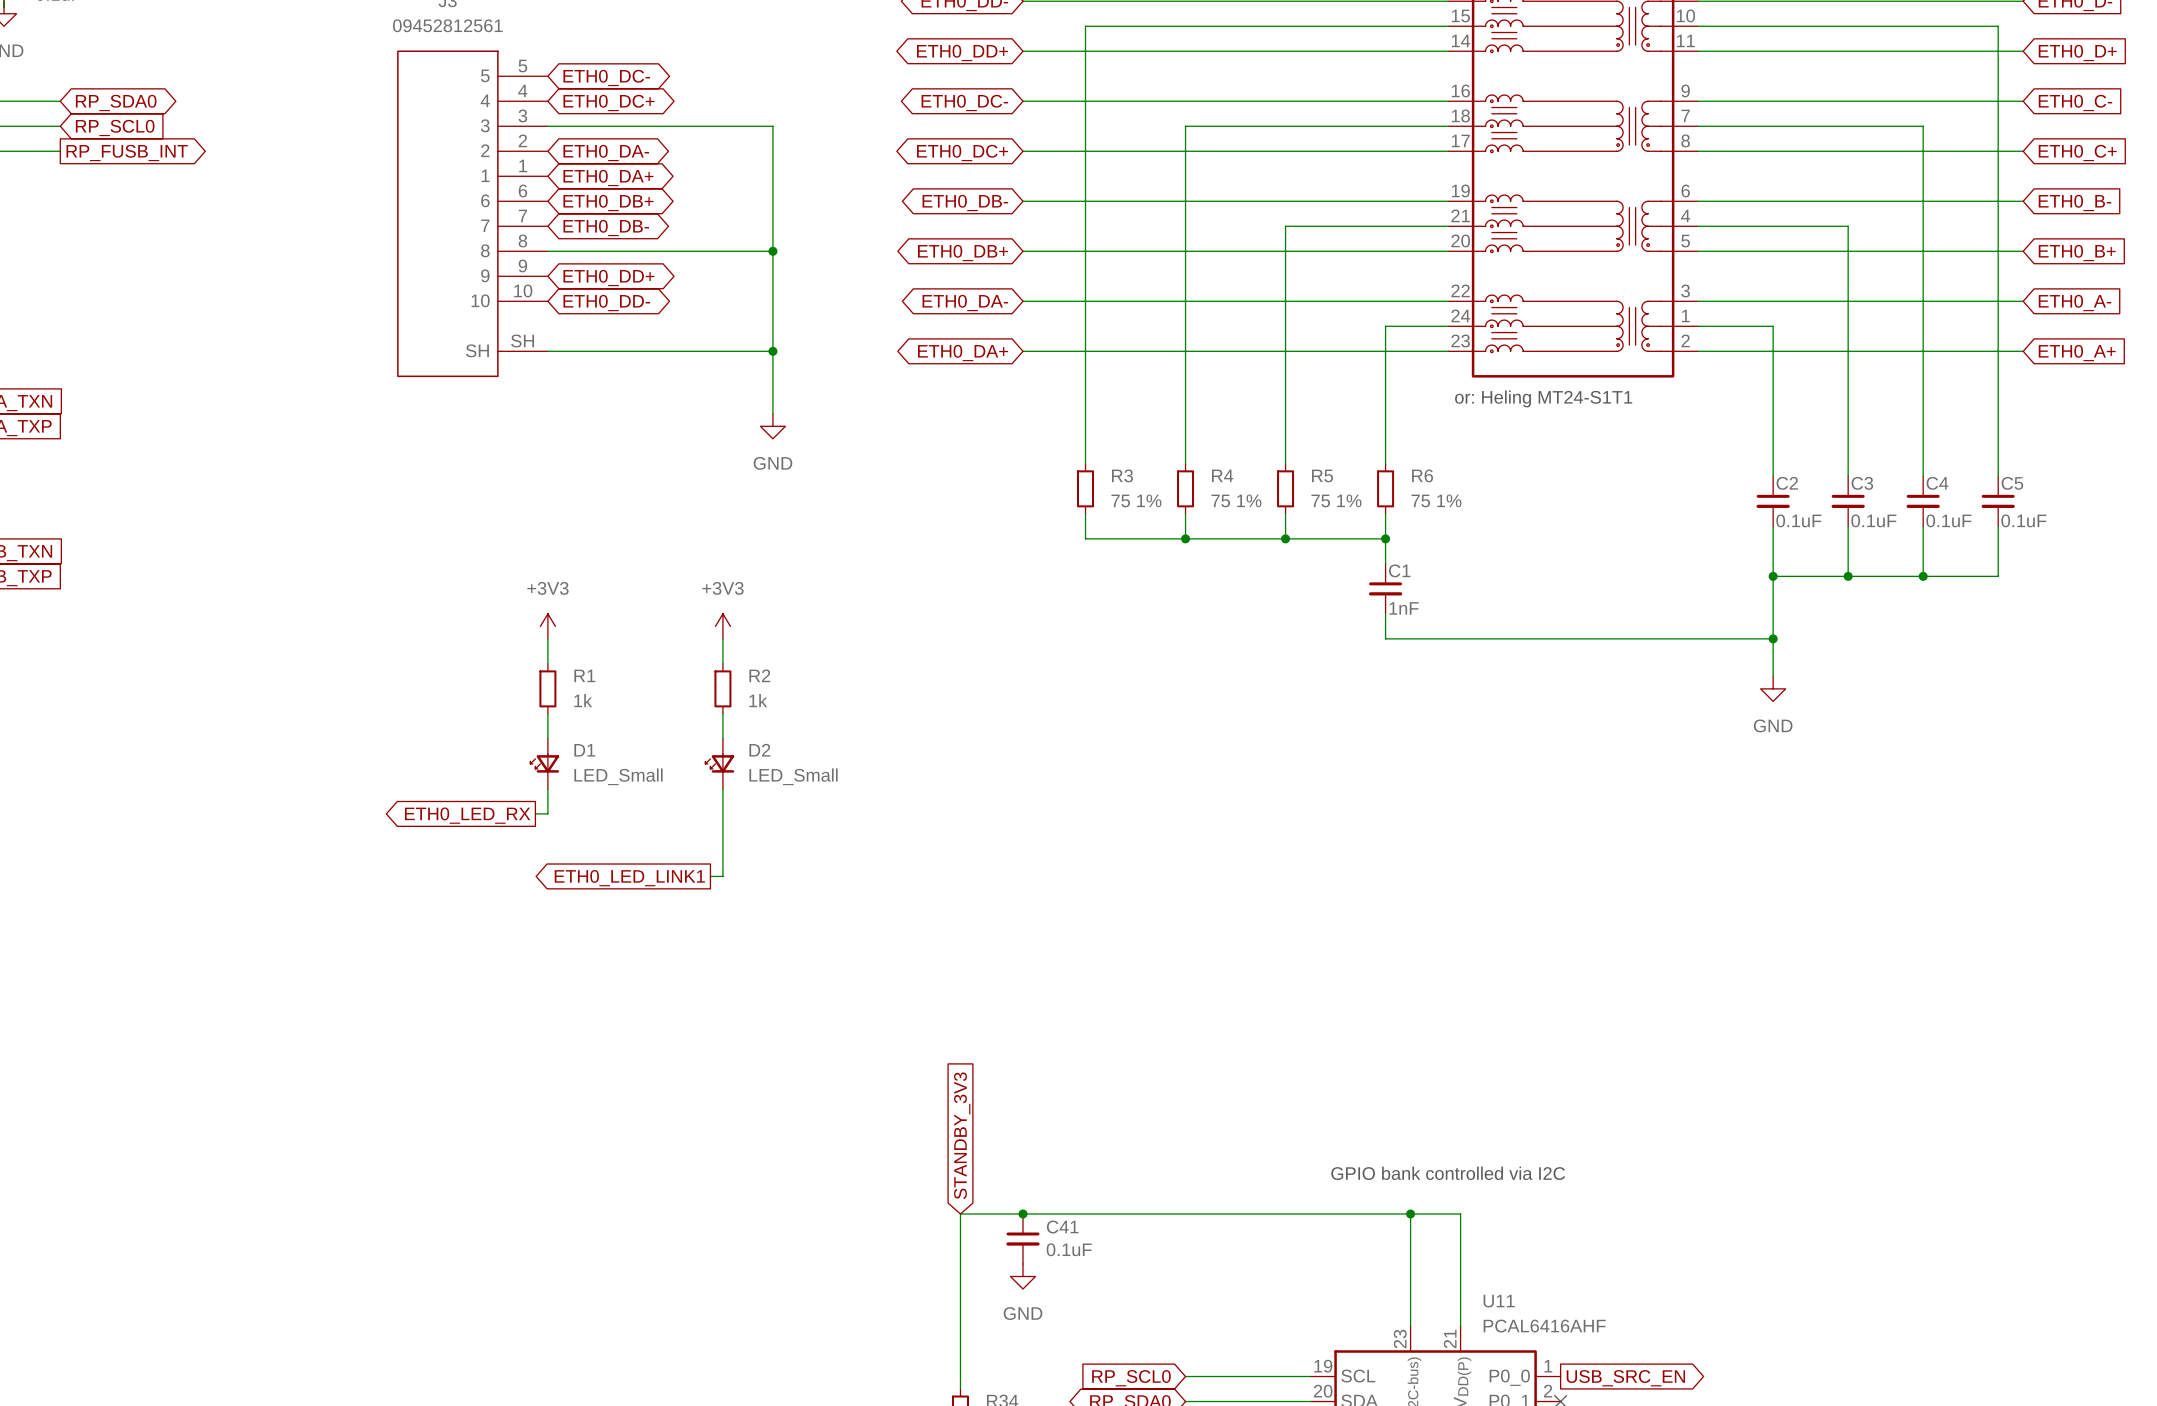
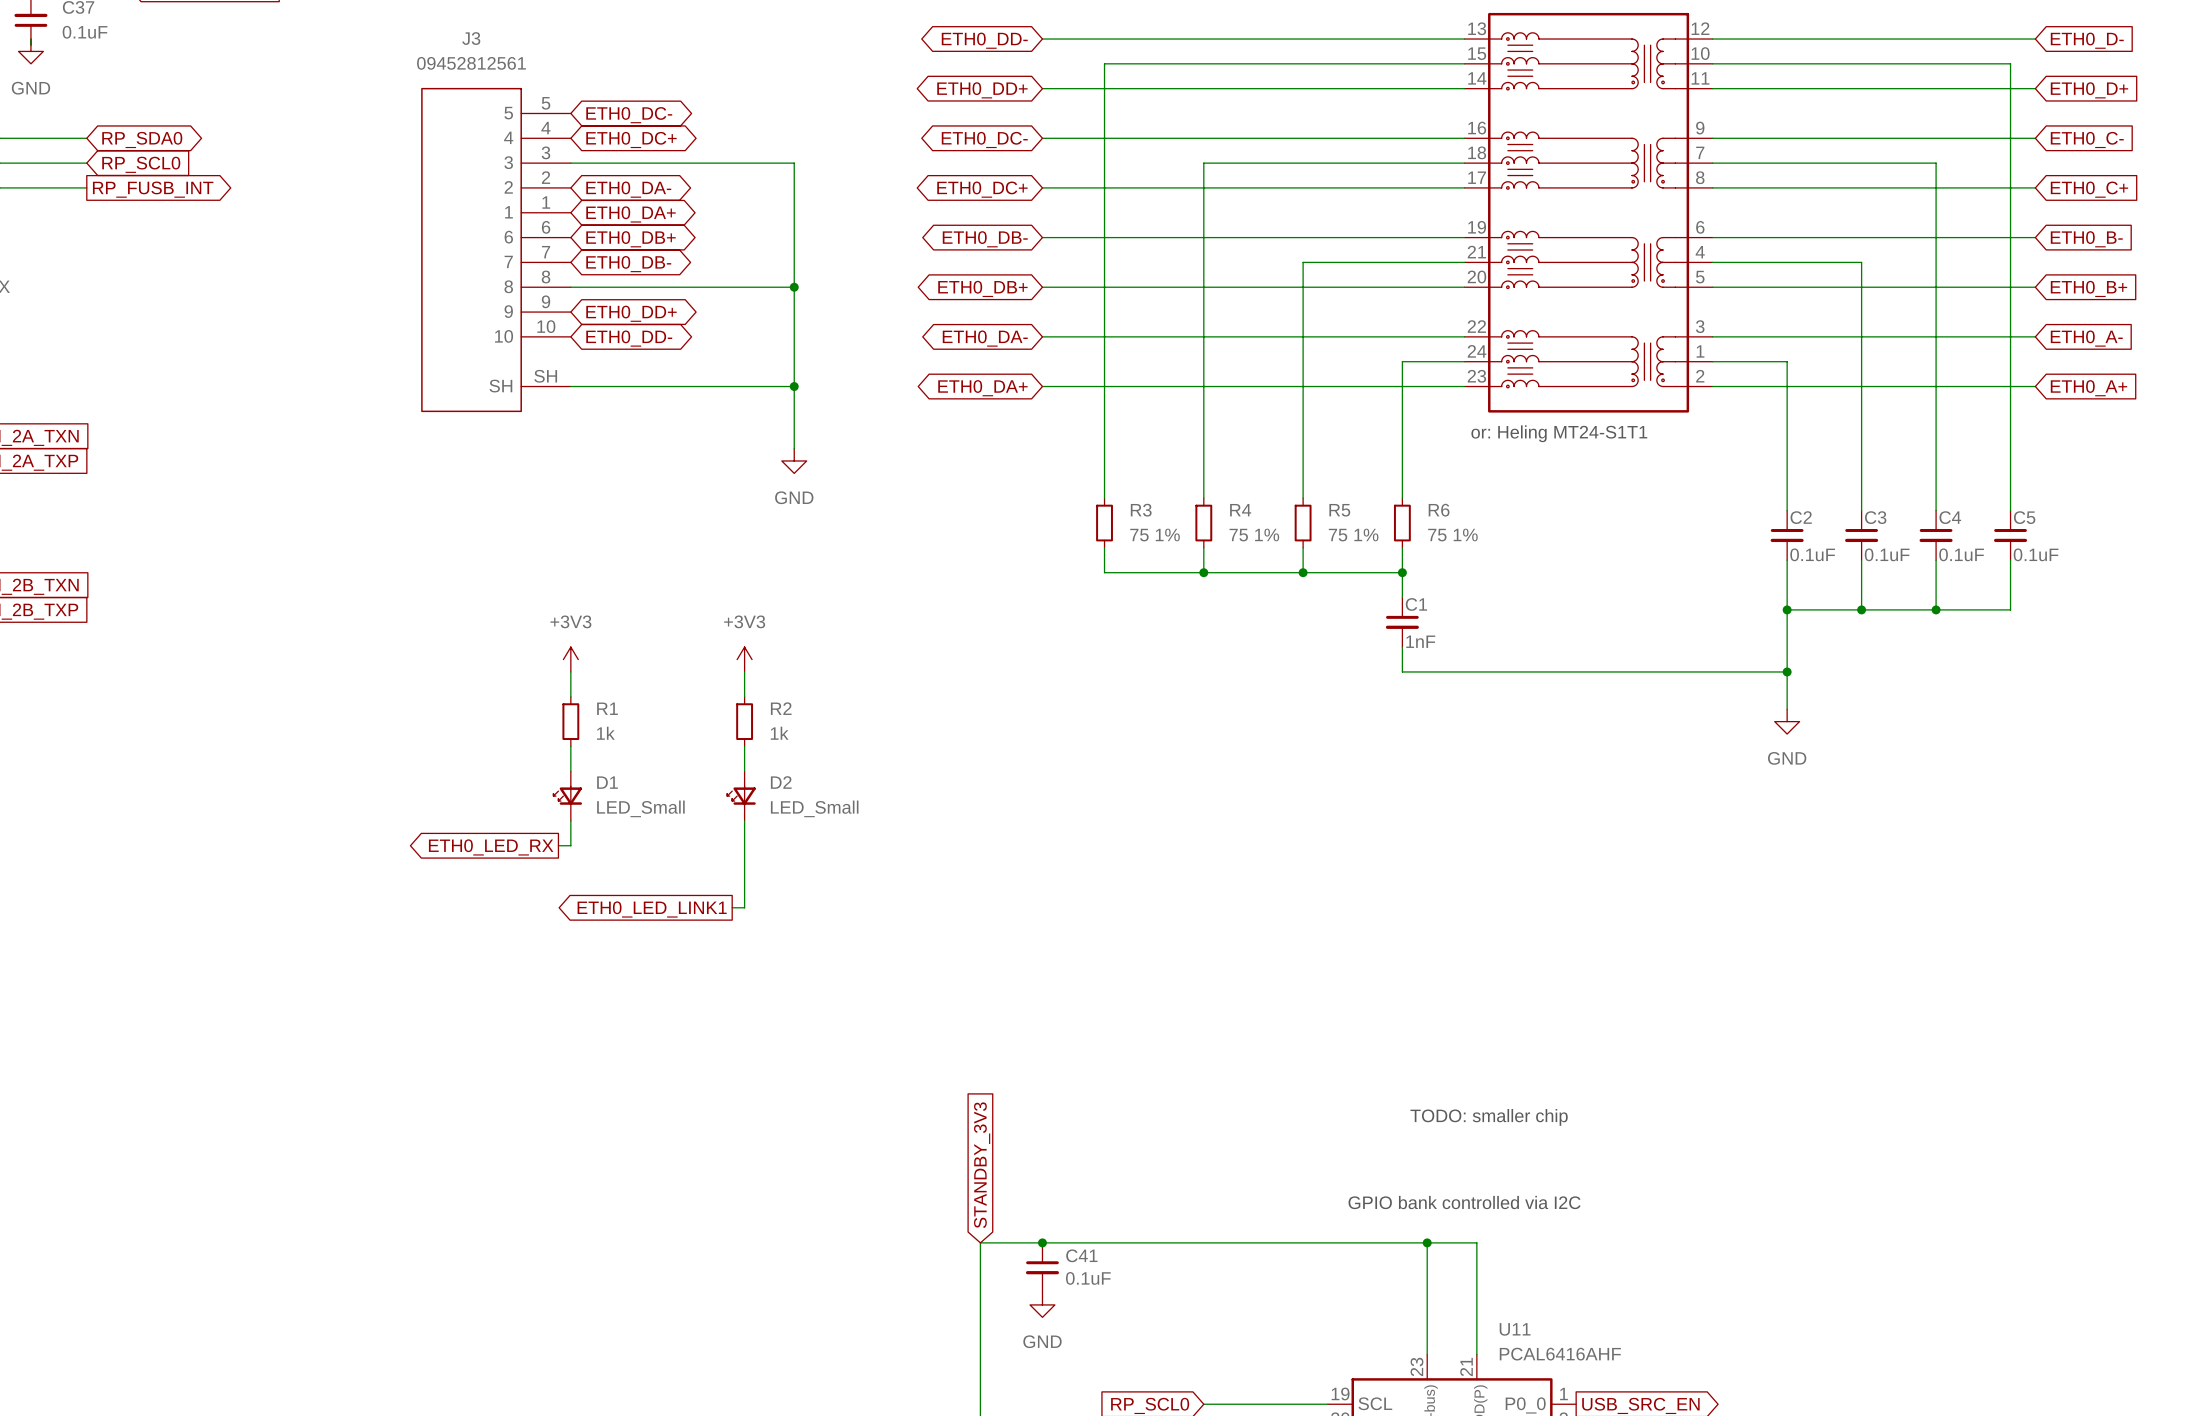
text: none -> TODO: smaller chip (1489, 1117)

